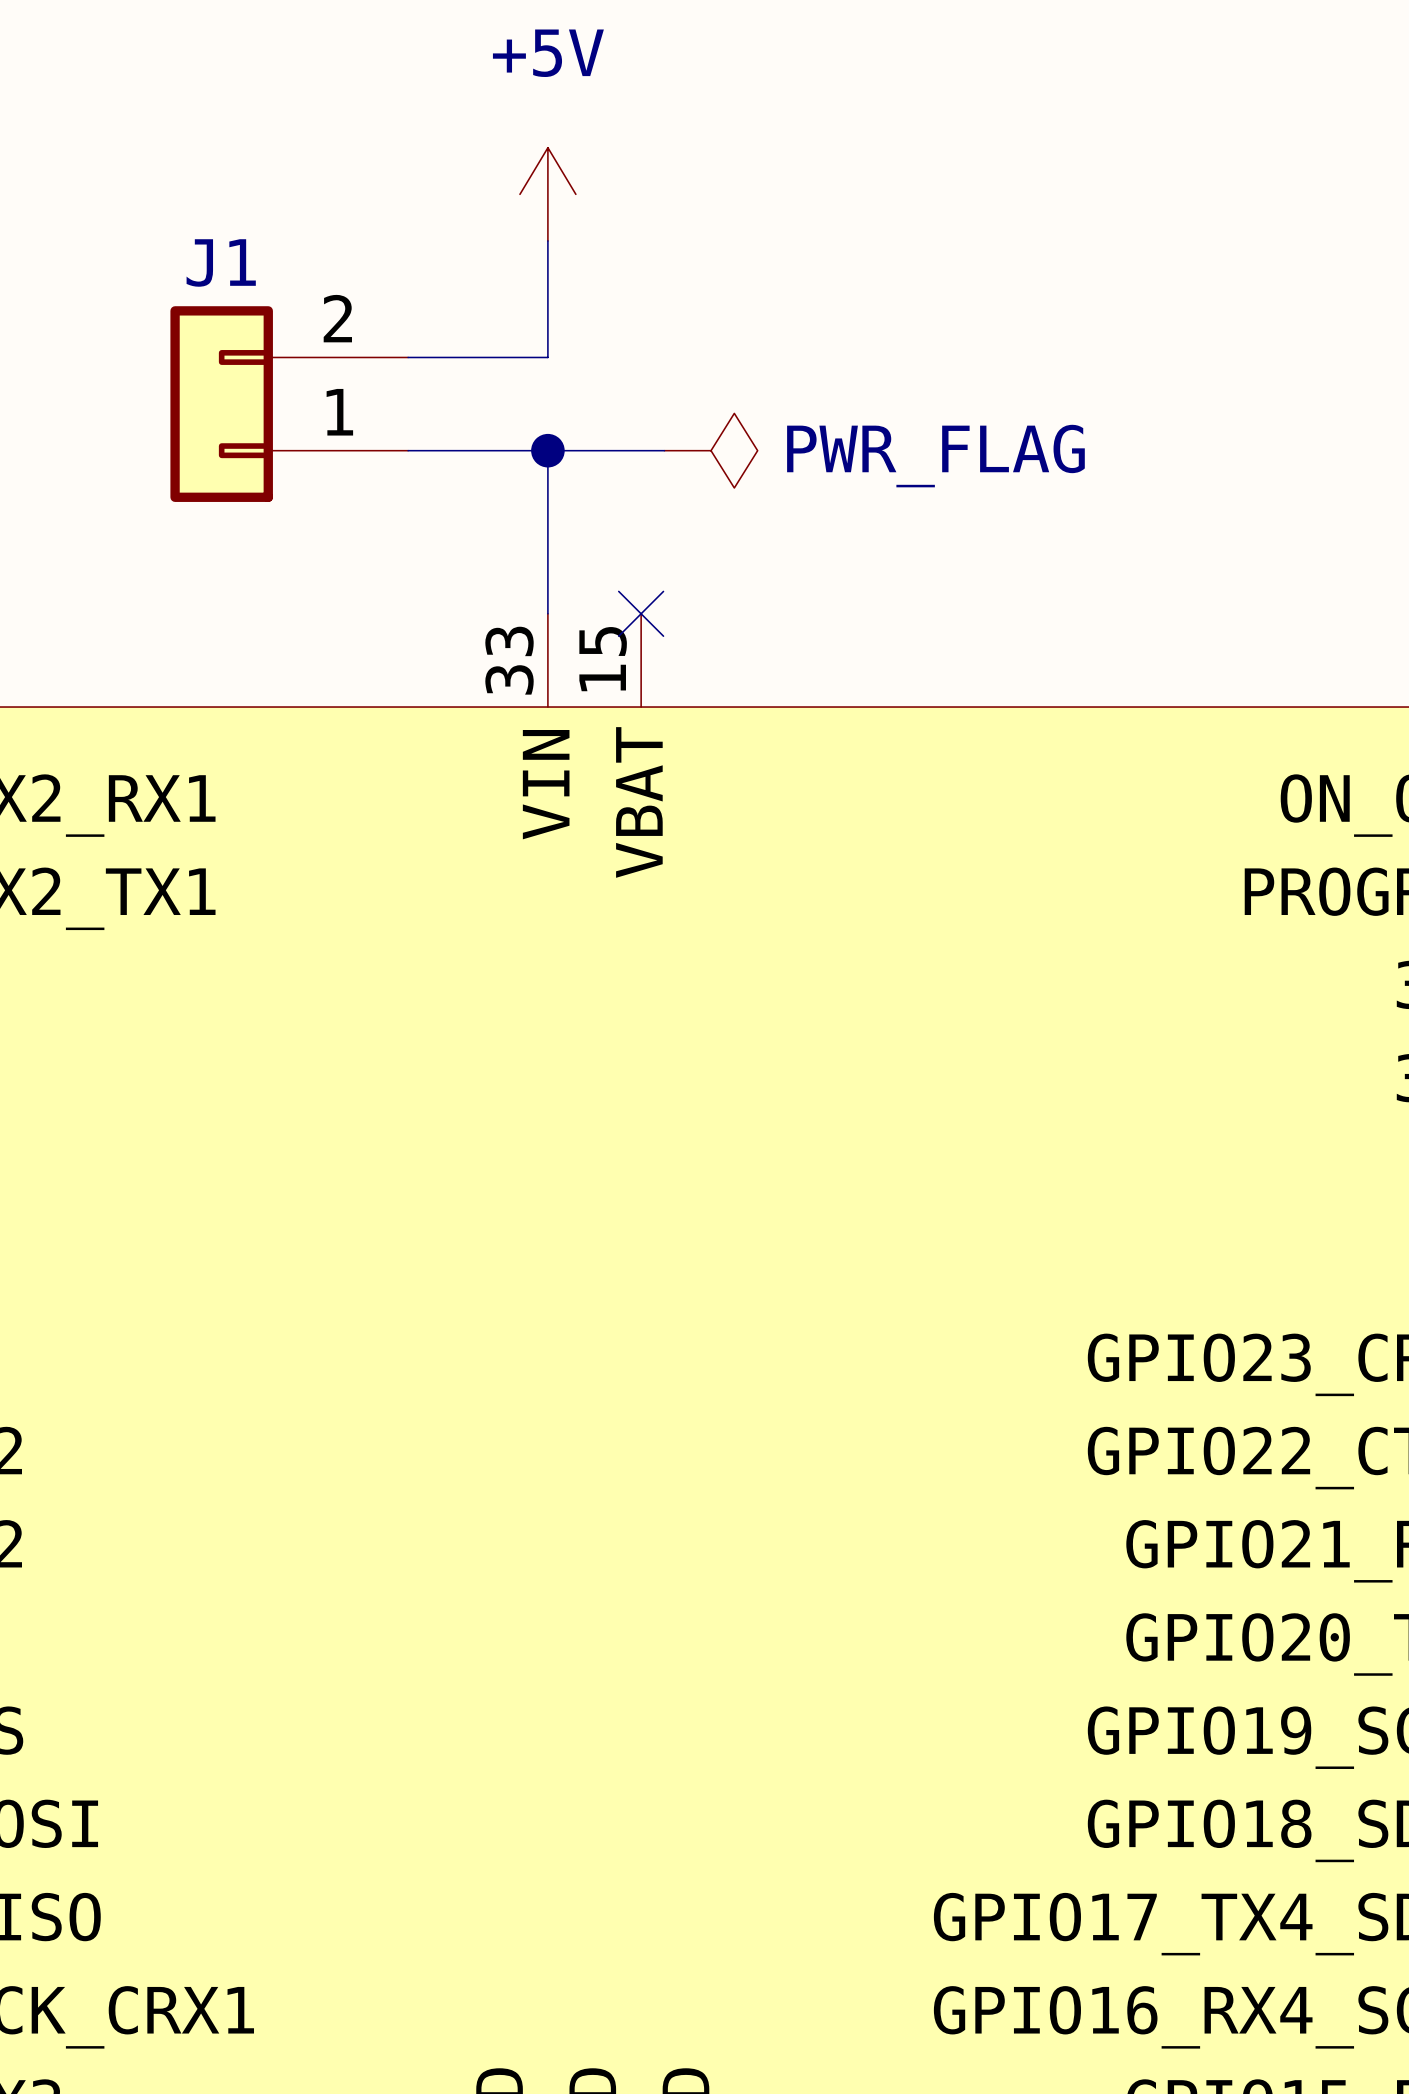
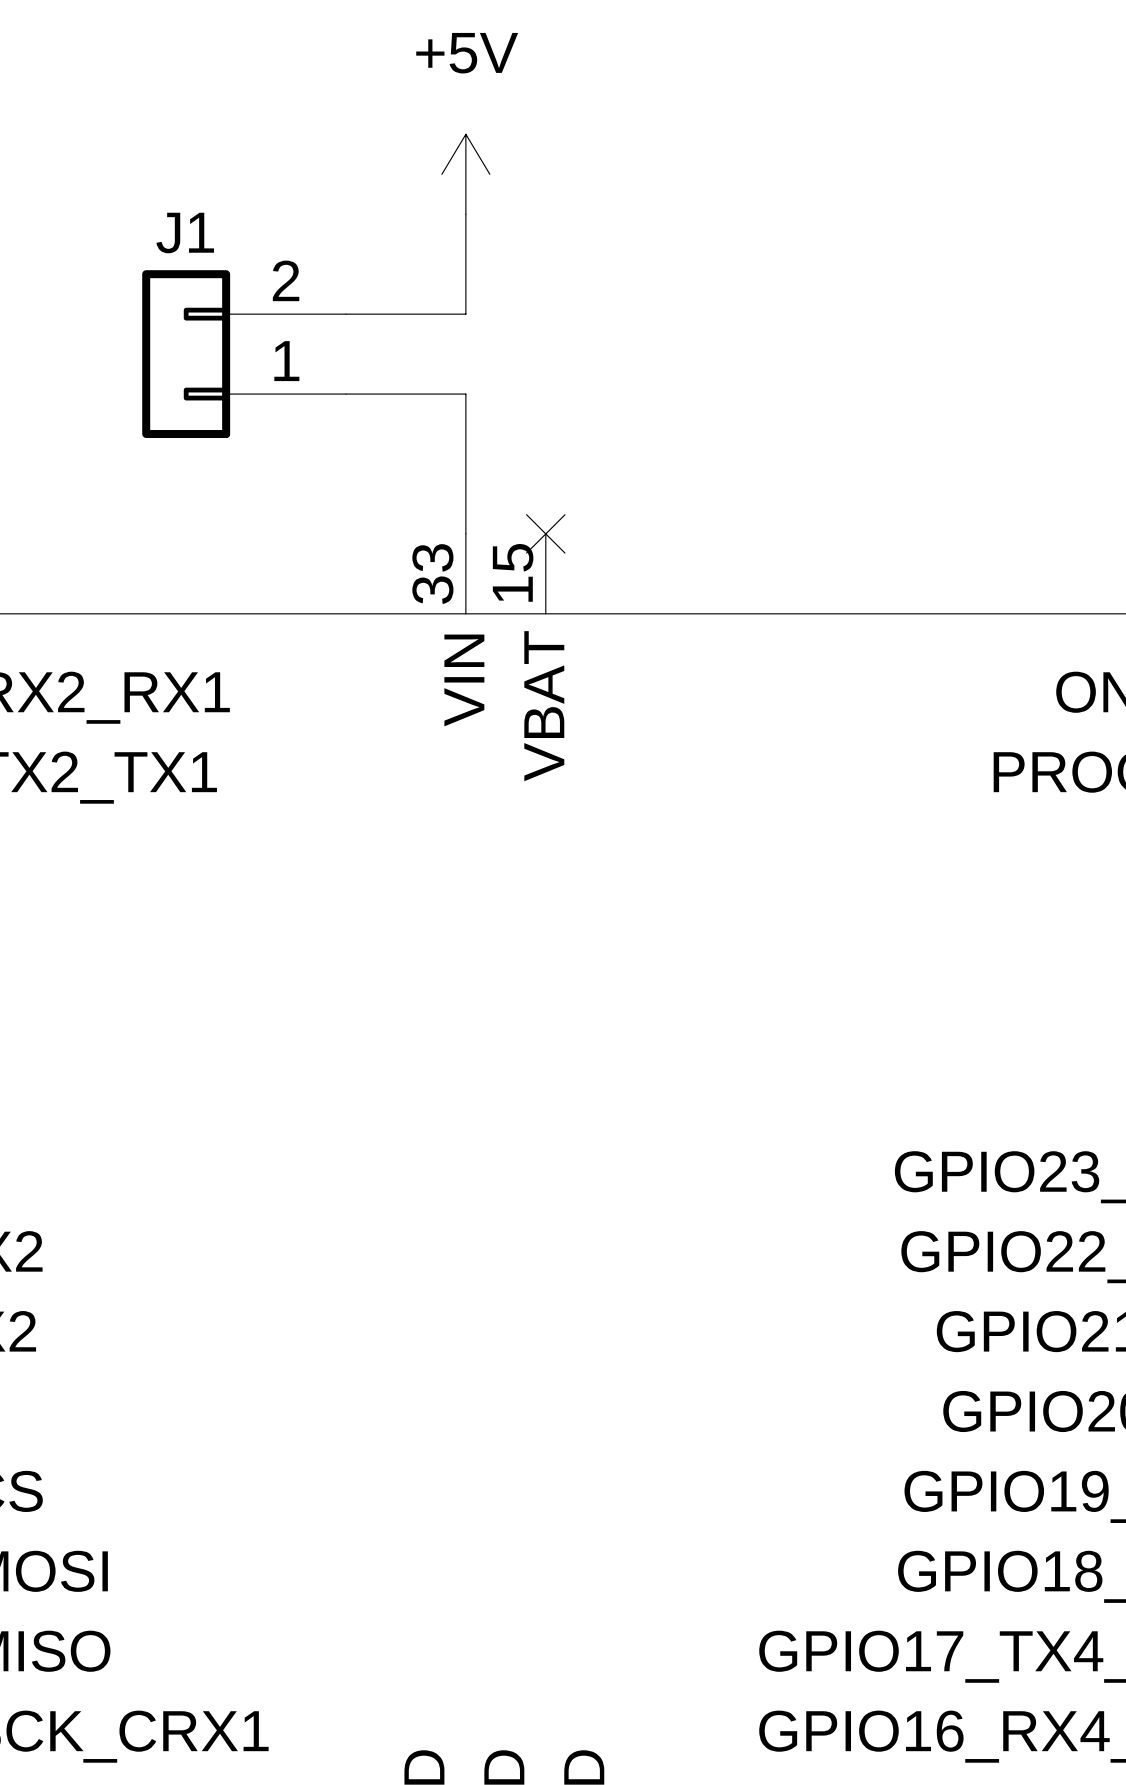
wire: (547, 450) (664, 450) -> none
junction: (547, 450) -> none
power symbol: PWR_FLAG (711, 450) -> none

